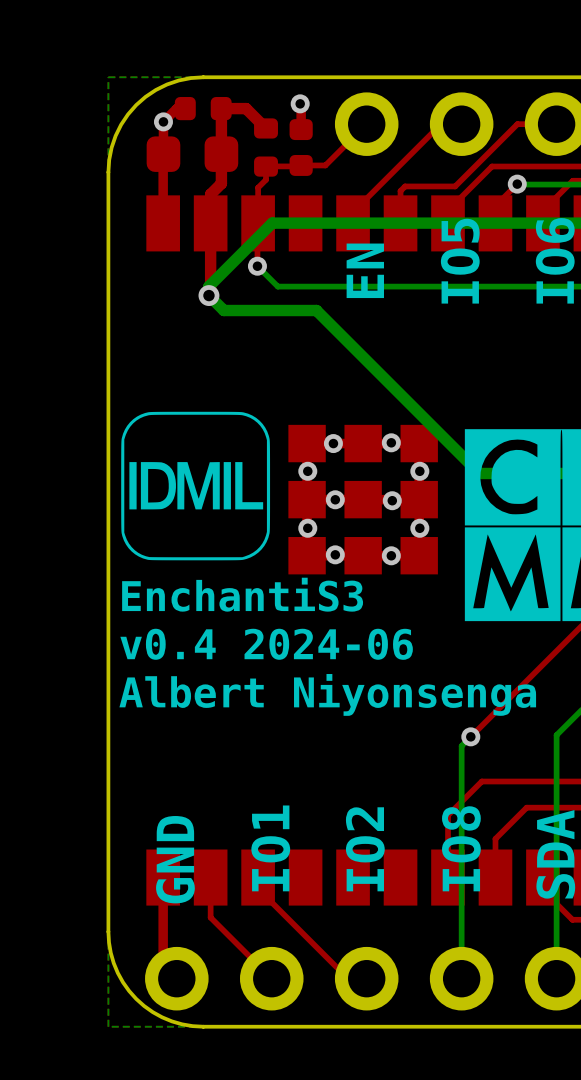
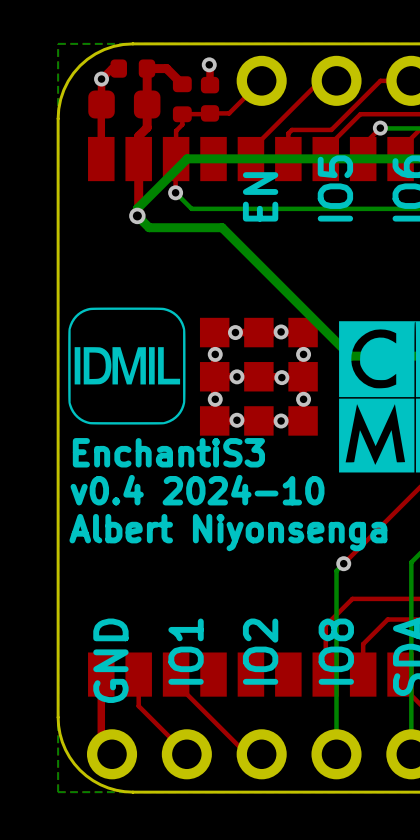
text: v0.4 2024-06 (266, 644) -> v0.4 2024-10 (197, 490)

